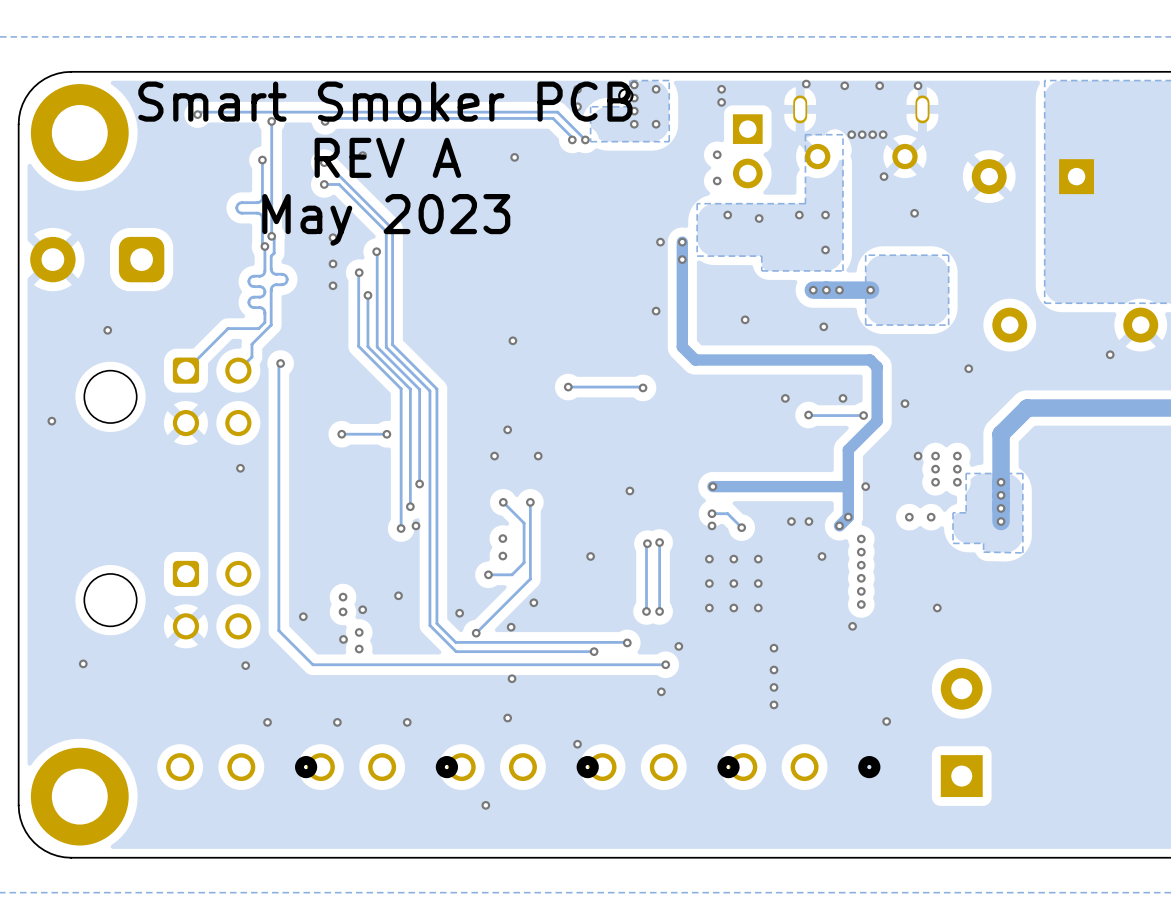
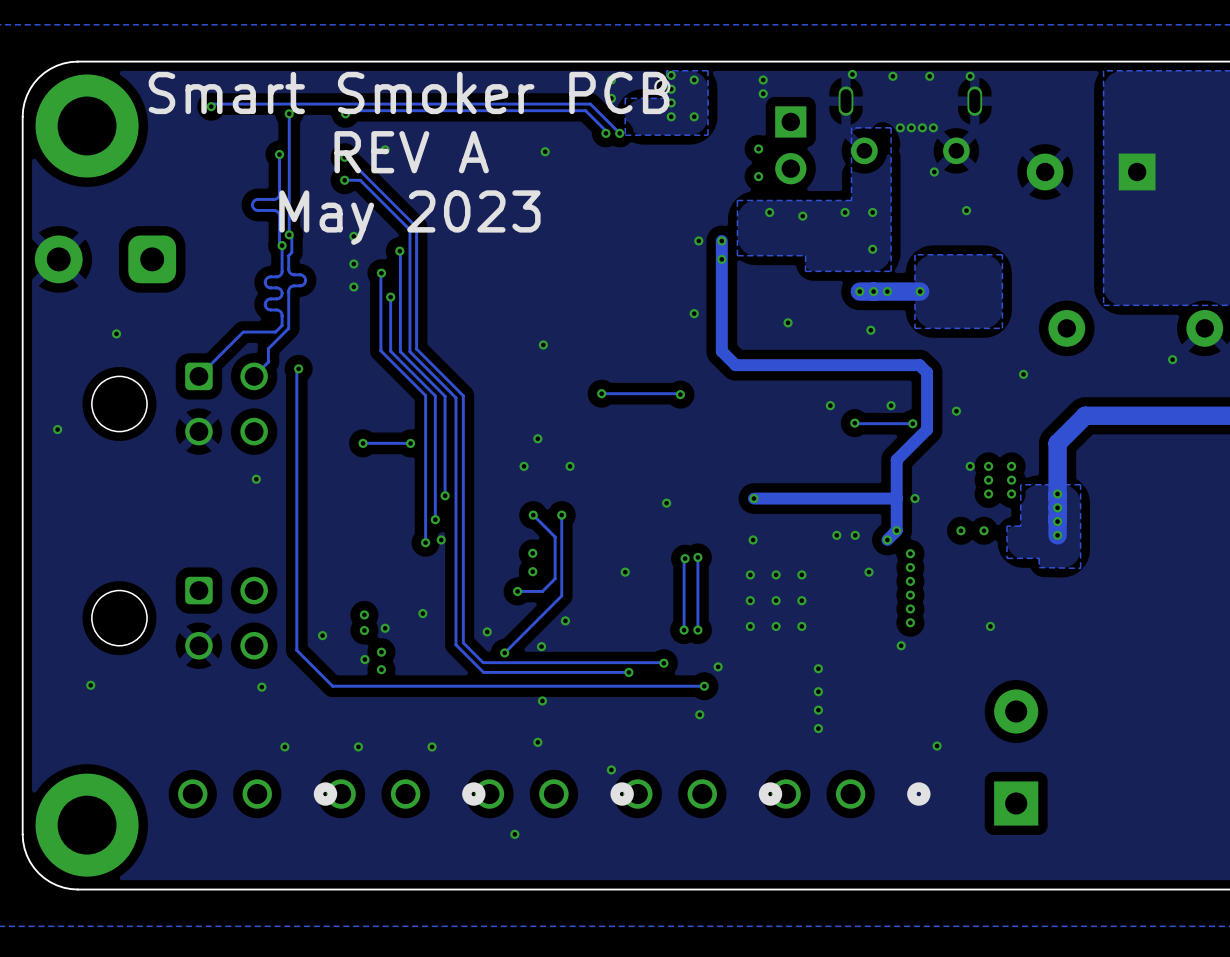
track: (712, 513) (727, 513) (741, 527) -> none
via: (712, 513) -> none
via: (741, 527) -> none

